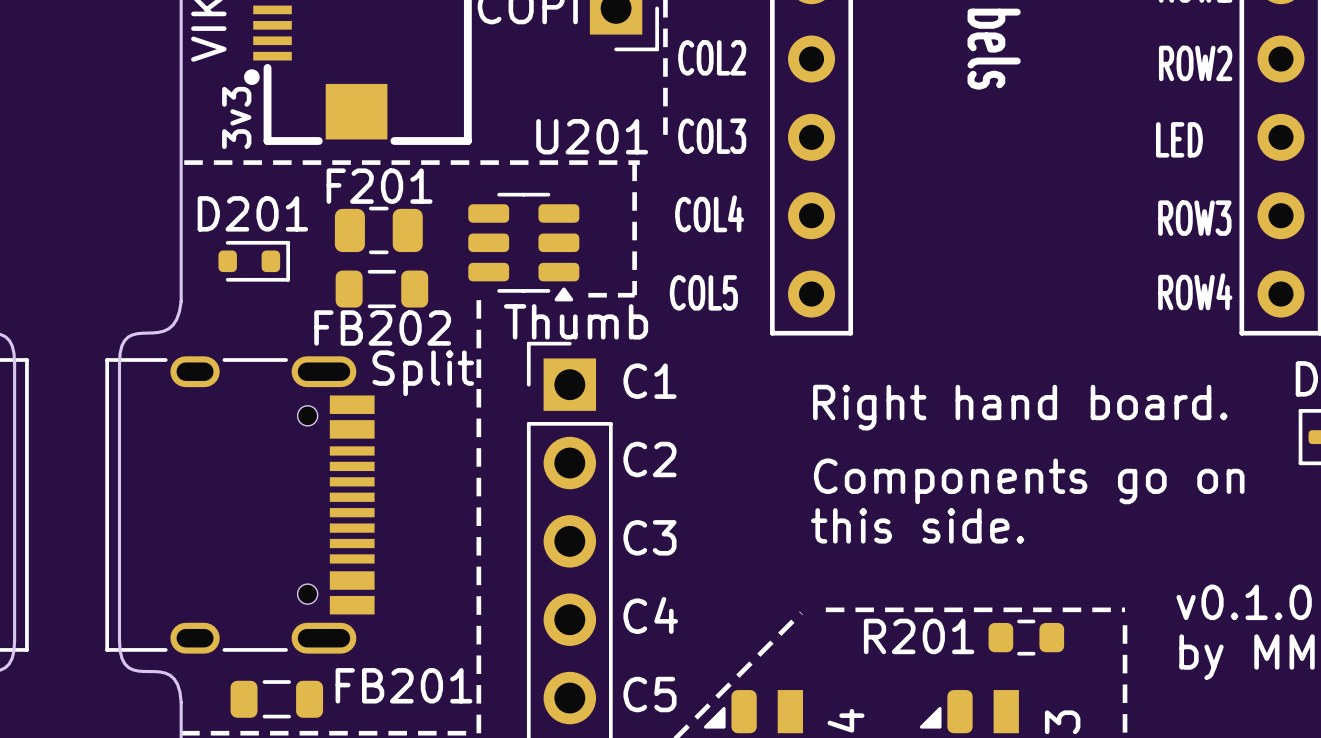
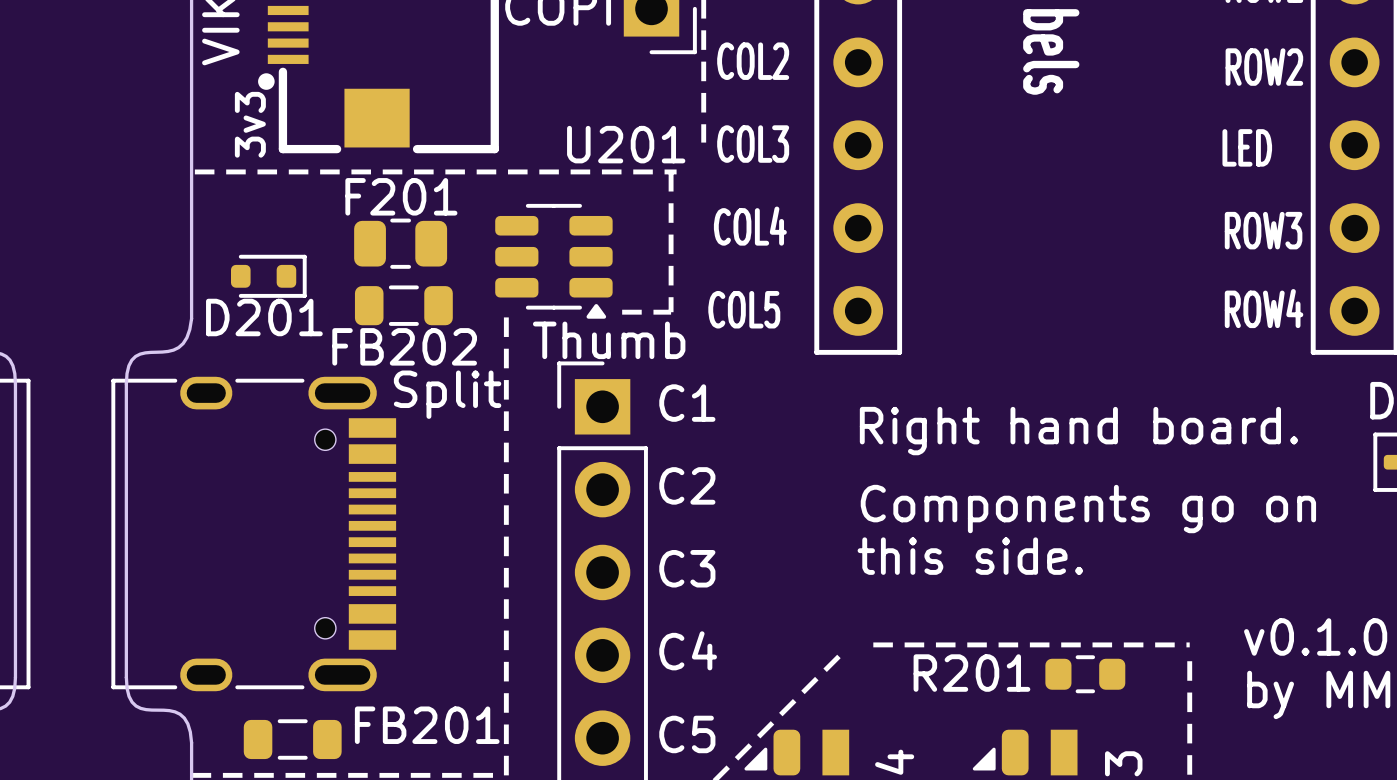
D201 name position: D201 (252, 213) -> D201 (264, 317)

